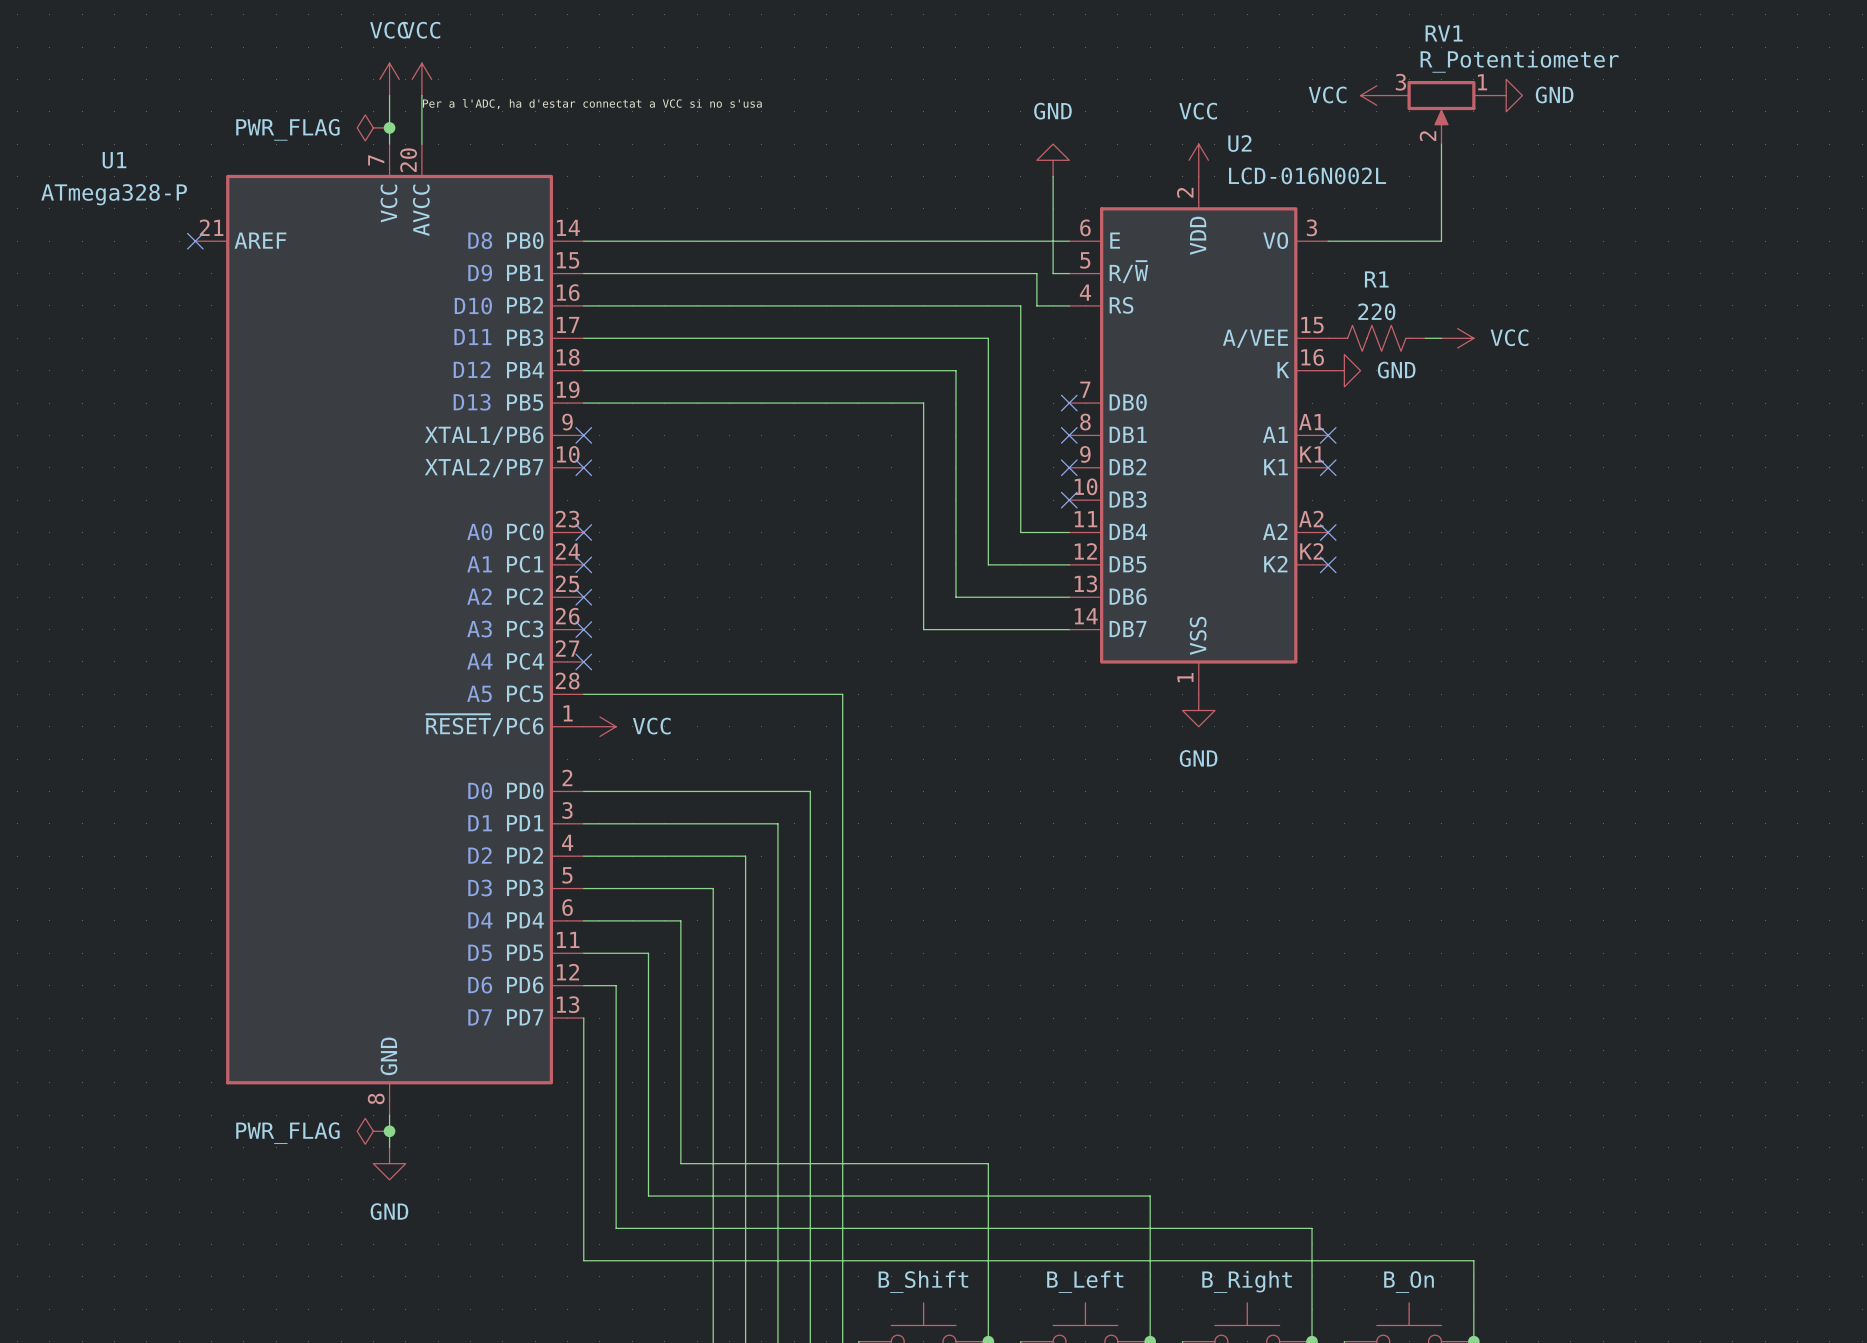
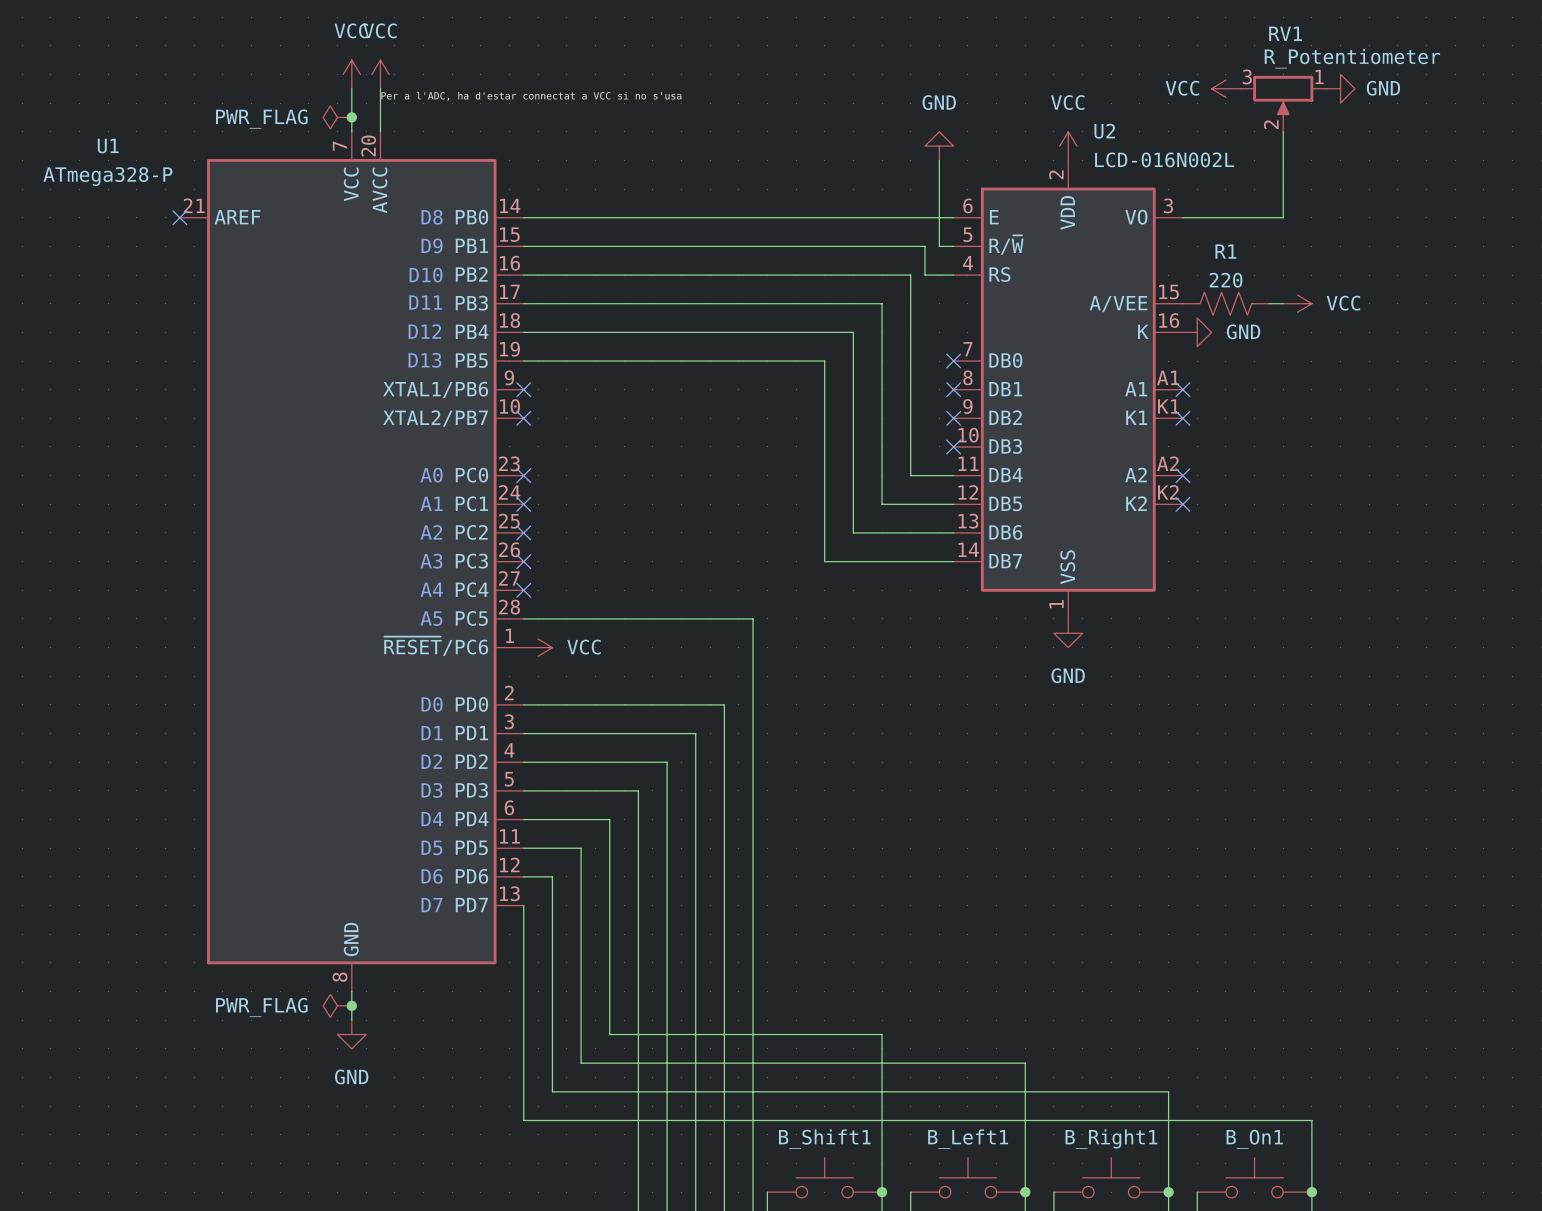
B_Shift name: B_Shift (923, 1281) -> B_Shift1 (824, 1139)
B_Left name: B_Left (1085, 1281) -> B_Left1 (968, 1139)
B_Right name: B_Right (1247, 1281) -> B_Right1 (1111, 1139)
B_On name: B_On (1409, 1282) -> B_On1 (1254, 1139)

